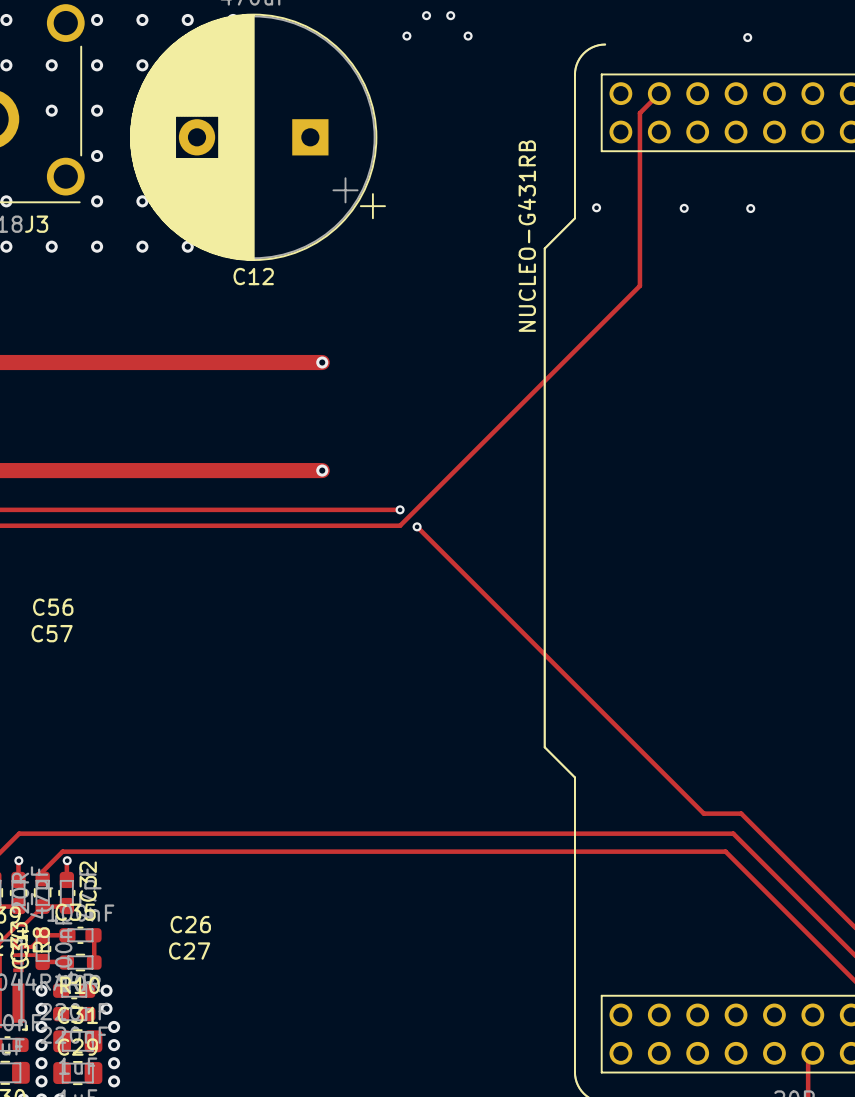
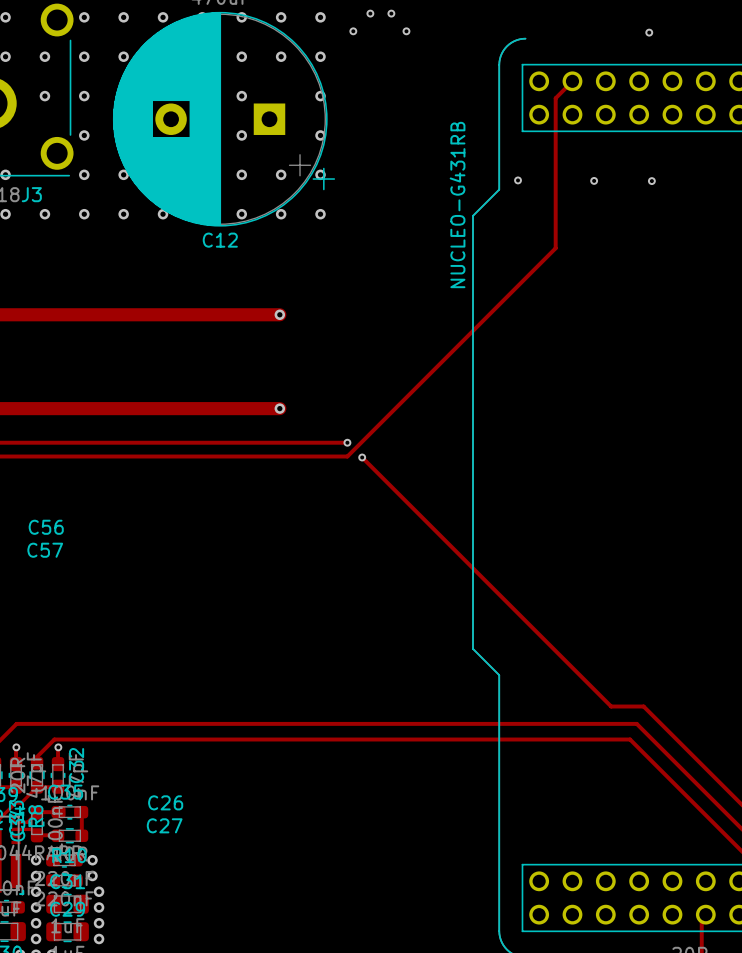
via: none -> (241, 17)
via: none -> (281, 17)
via: none -> (320, 17)
via: none -> (241, 56)
via: none -> (281, 56)
via: none -> (320, 56)
via: none -> (241, 96)
via: none -> (320, 96)
via: none -> (241, 135)
via: none -> (320, 135)
via: none -> (241, 174)
via: none -> (281, 174)
via: none -> (320, 174)
via: none -> (241, 214)
via: none -> (281, 214)
via: none -> (320, 214)

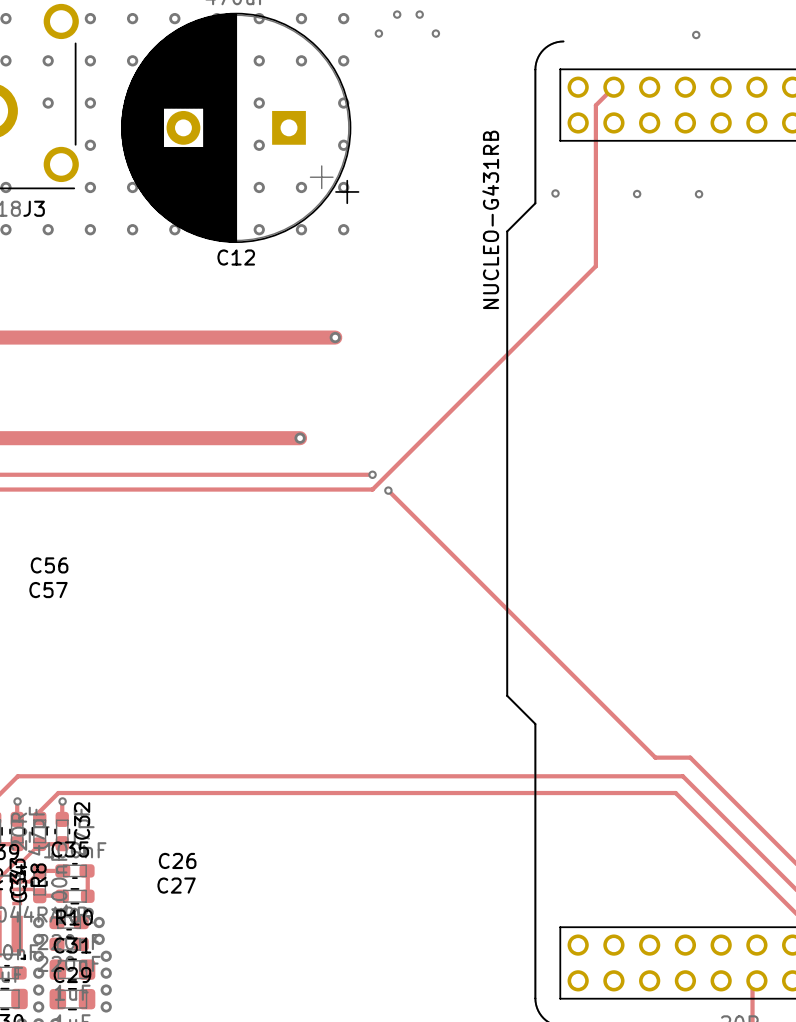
track: none -> (300, 337) (335, 337)
via position: (279, 314) -> (335, 337)

